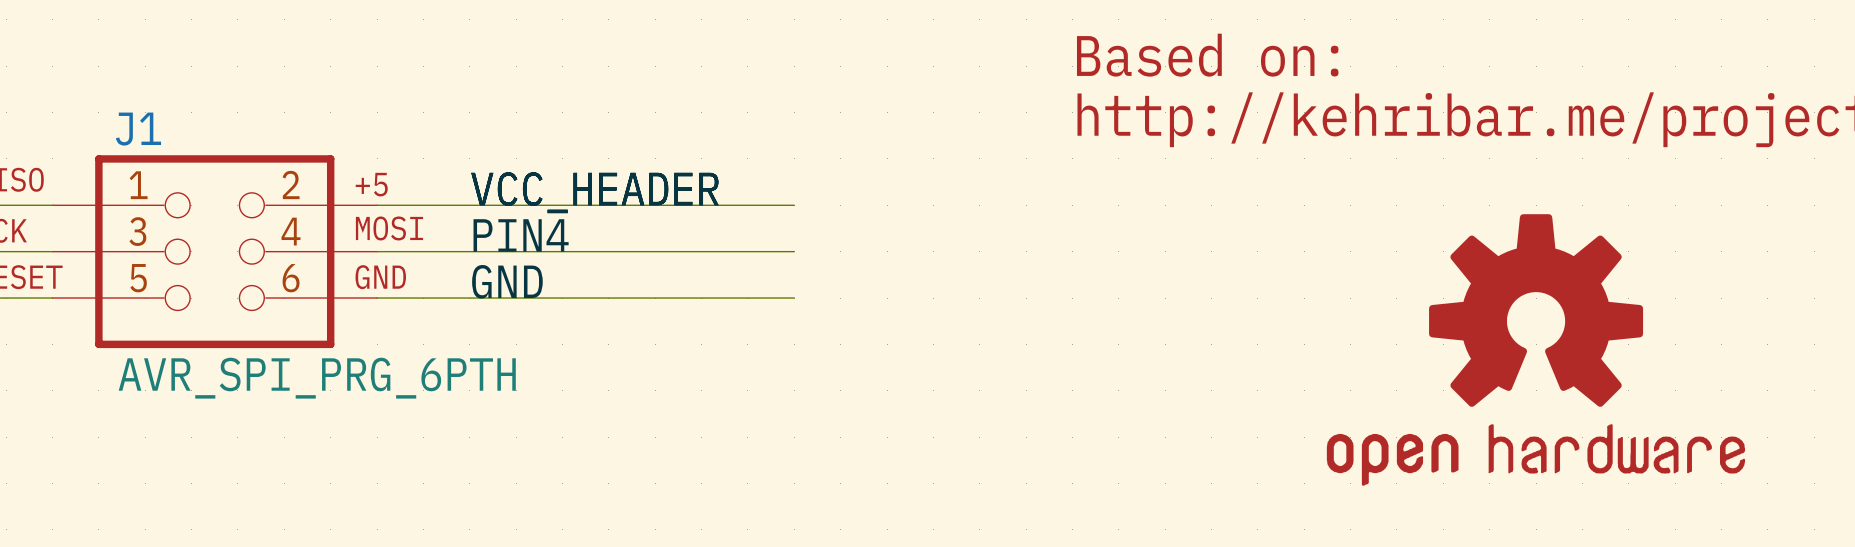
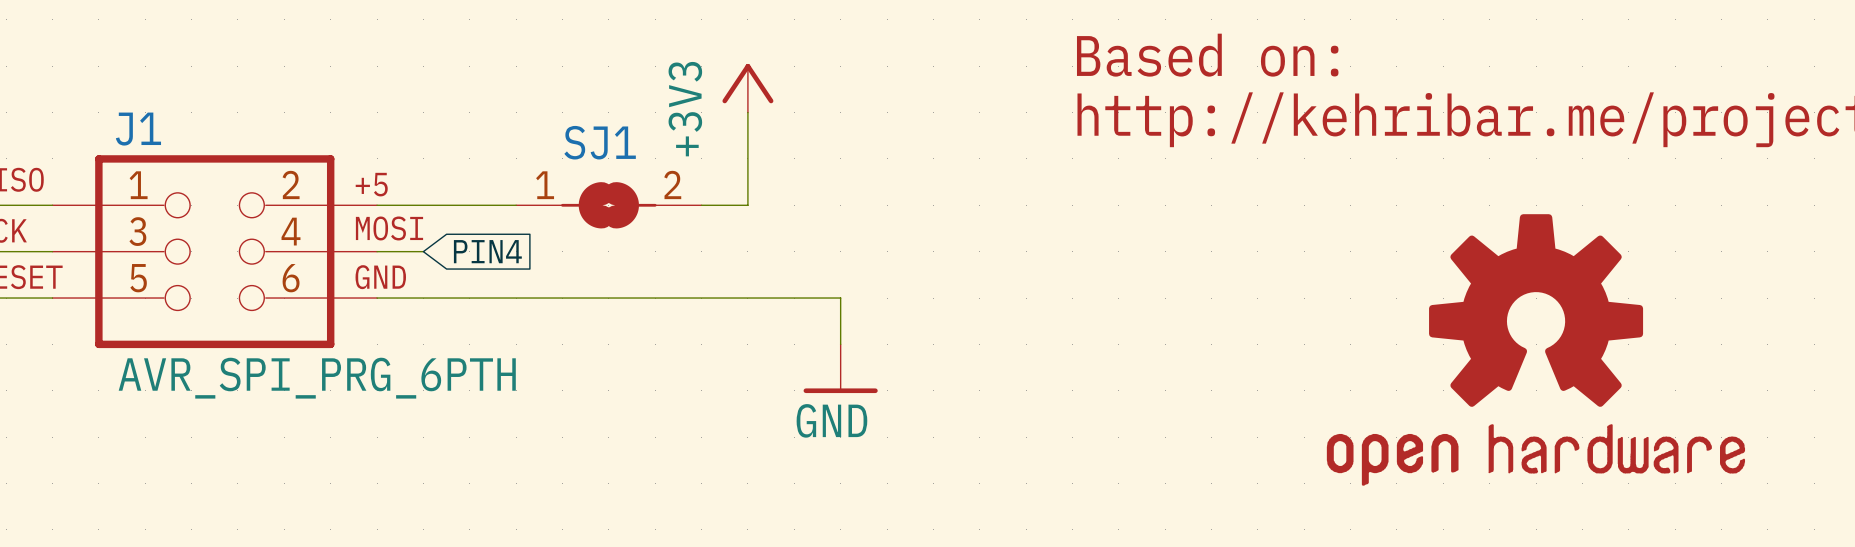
power symbol: none -> +3V3 (747, 88)
label: VCC_HEADER (594, 192) -> none
SJ1: none -> (608, 205)
wire: (747, 205) (794, 205) -> (747, 205) (747, 112)
label: PIN4 (521, 235) -> none
wire: (423, 251) (794, 251) -> none
global label: none -> PIN4 (487, 251)
label: GND (507, 281) -> none
wire: none -> (794, 298) (840, 298) (840, 344)
power symbol: none -> GND (840, 368)

